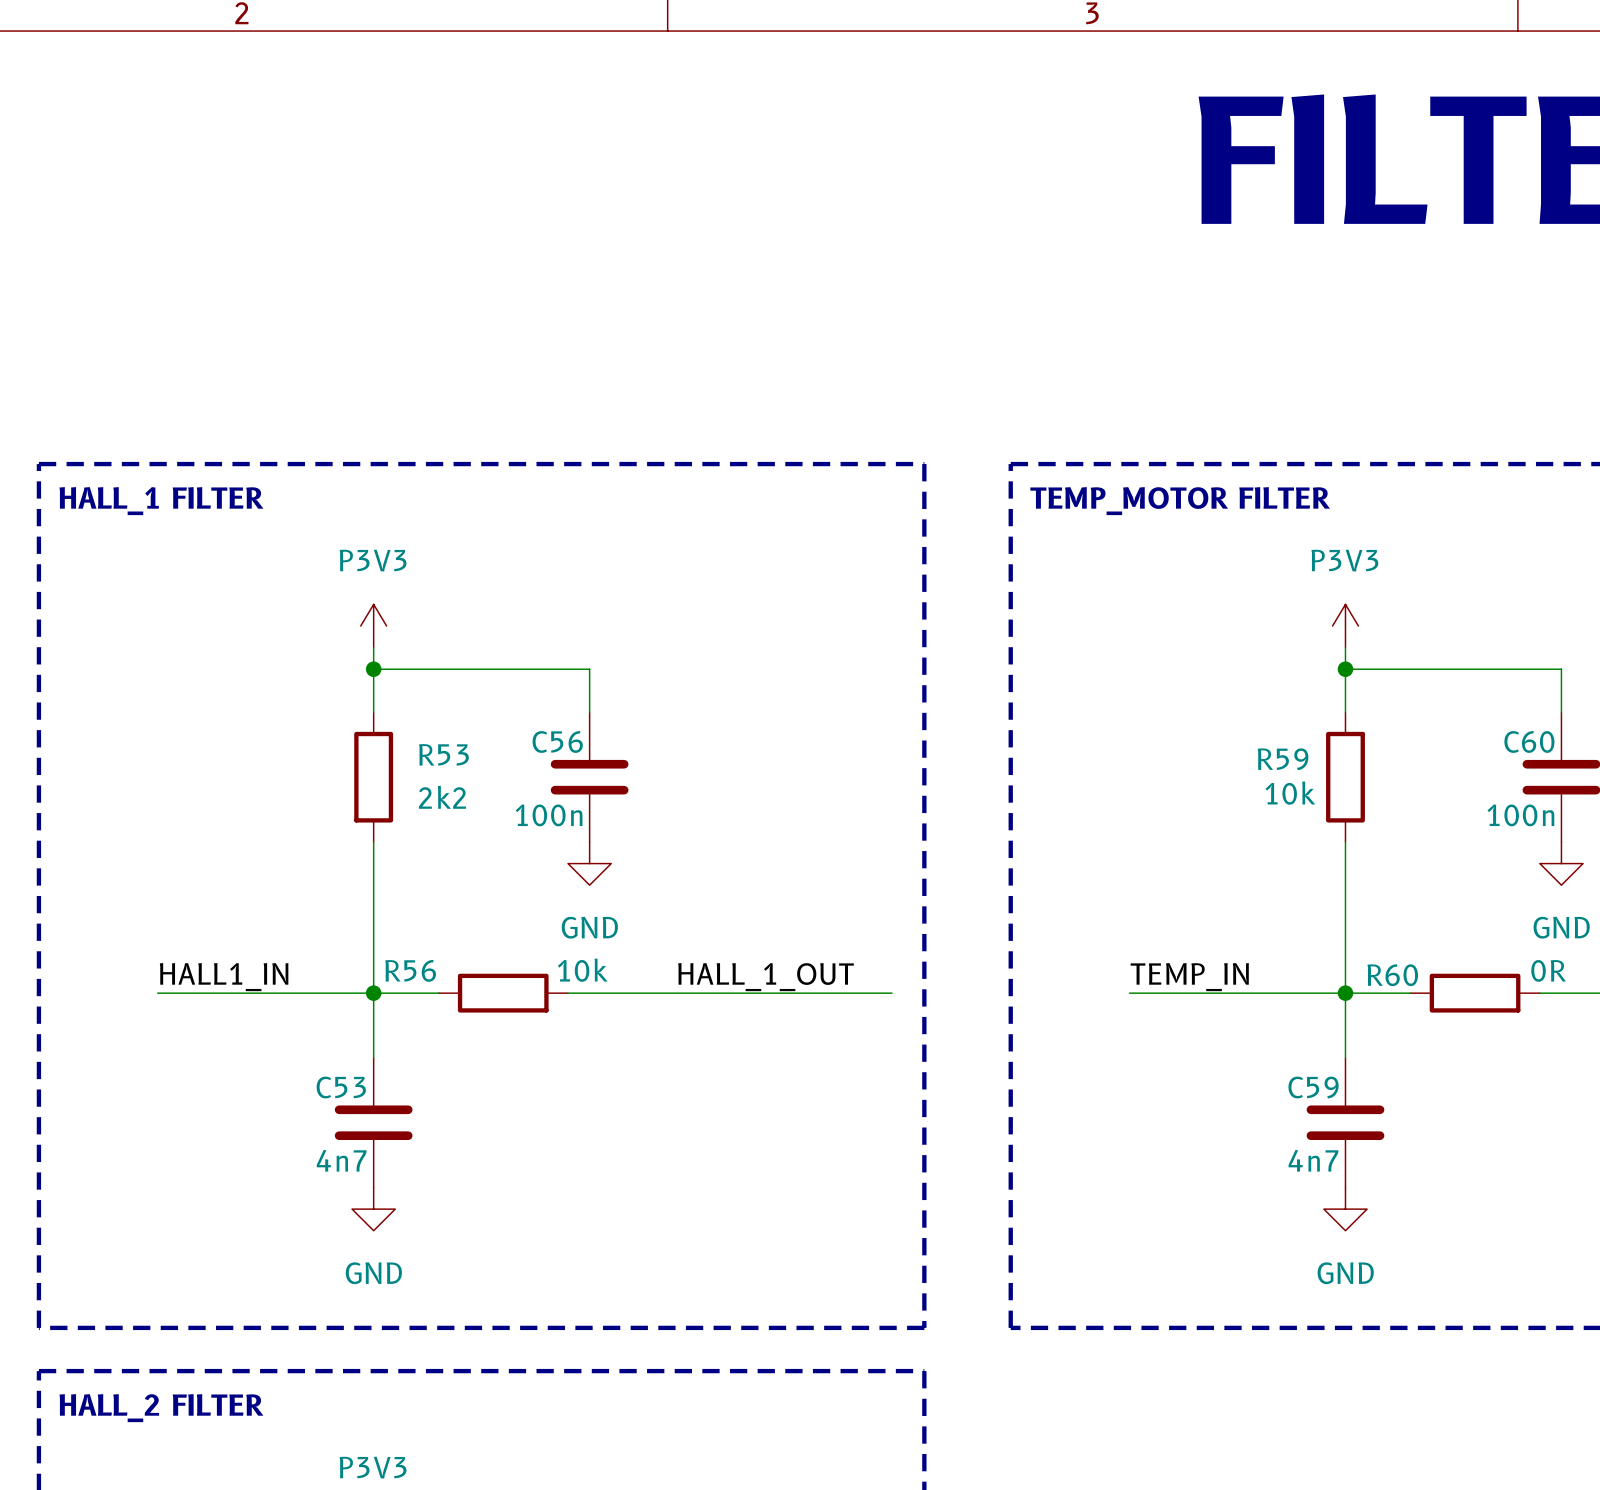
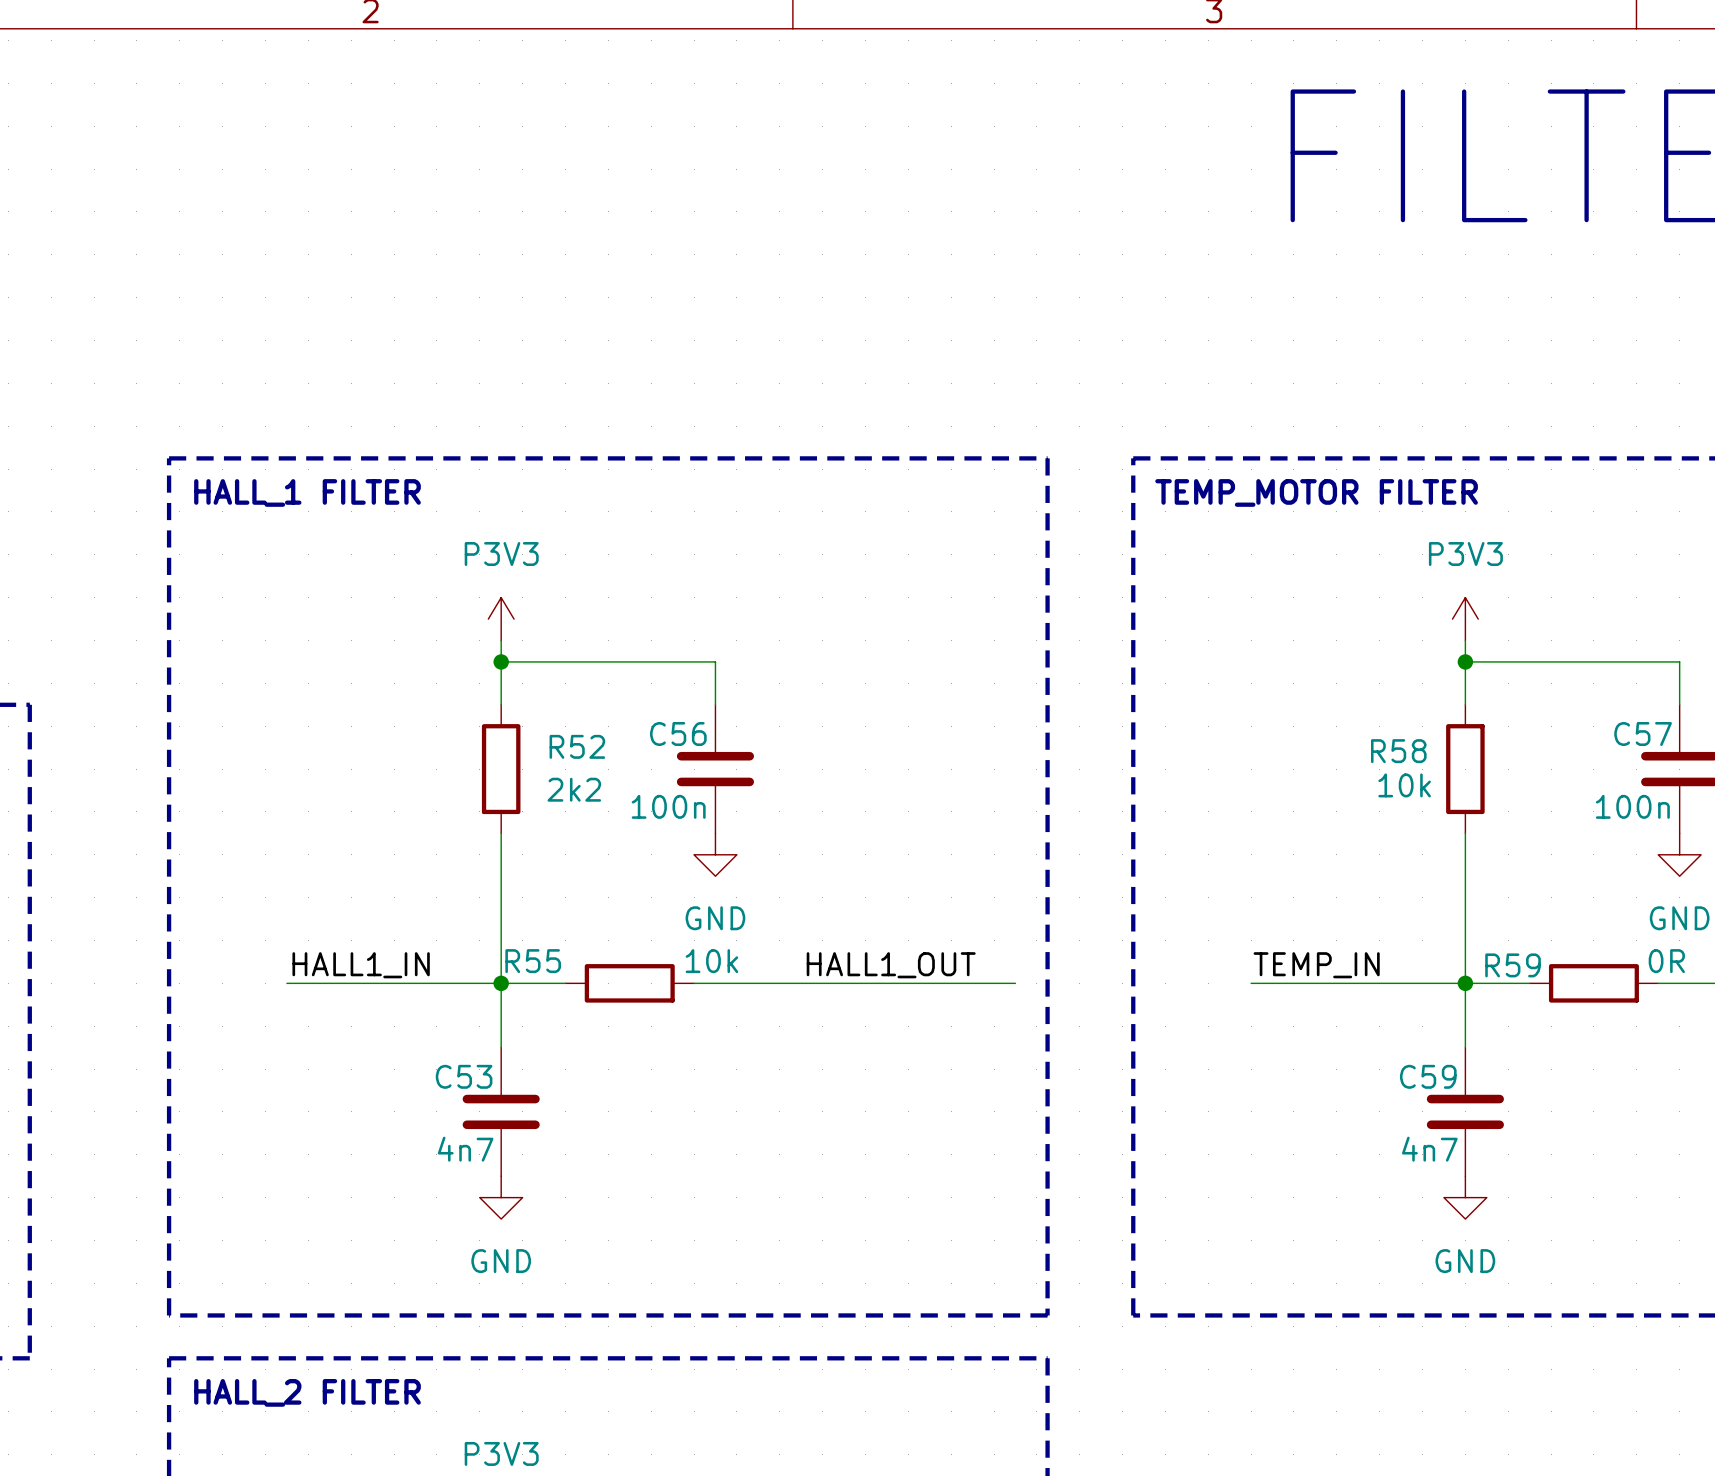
C60 name: C60 (1529, 741) -> C57 (1643, 734)
R53 name: R53 (443, 754) -> R52 (577, 746)
R59 name: R59 (1283, 759) -> R58 (1398, 751)
R56 name: R56 (410, 970) -> R55 (533, 961)
R60 name: R60 (1392, 975) -> R59 (1513, 965)
label: HALL_1_OUT (765, 977) -> HALL1_OUT (891, 965)

